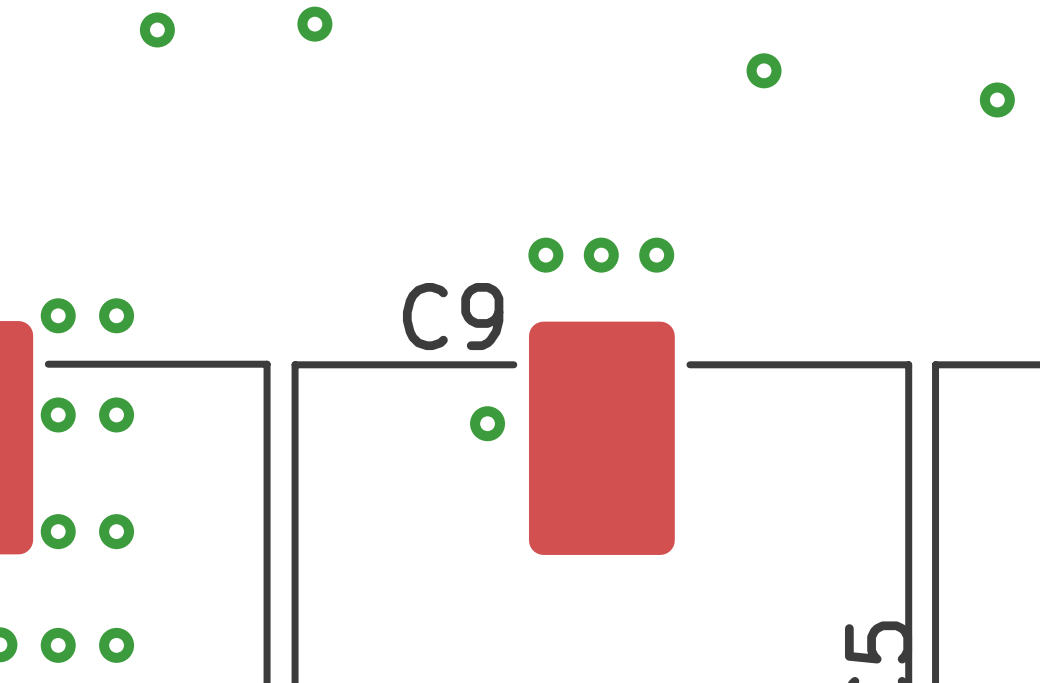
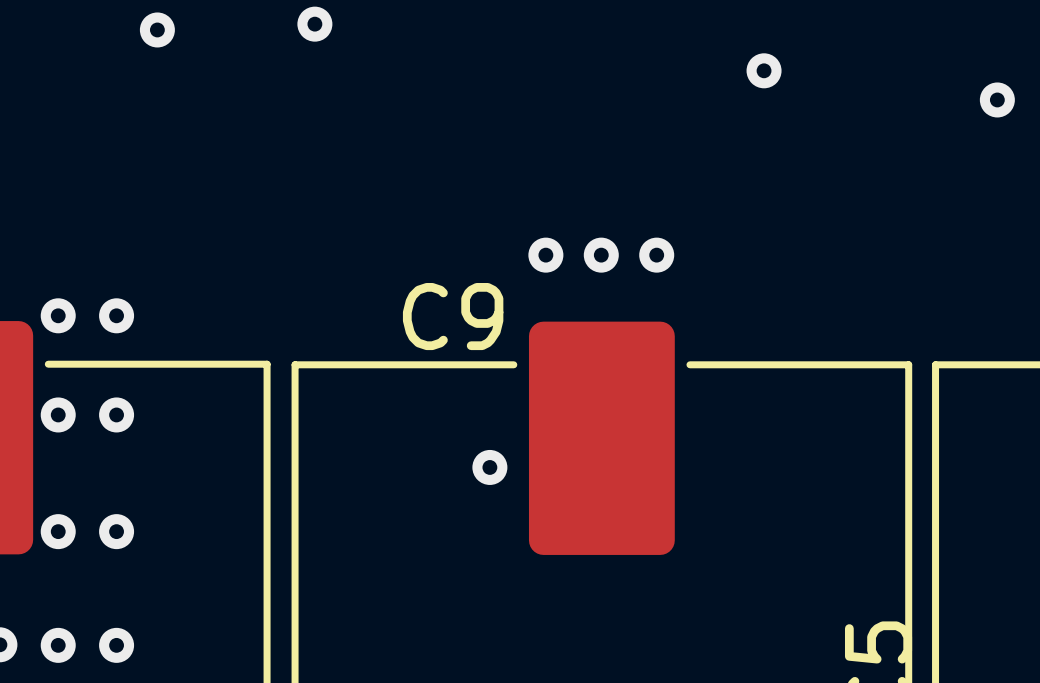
via position: (487, 423) -> (489, 467)

